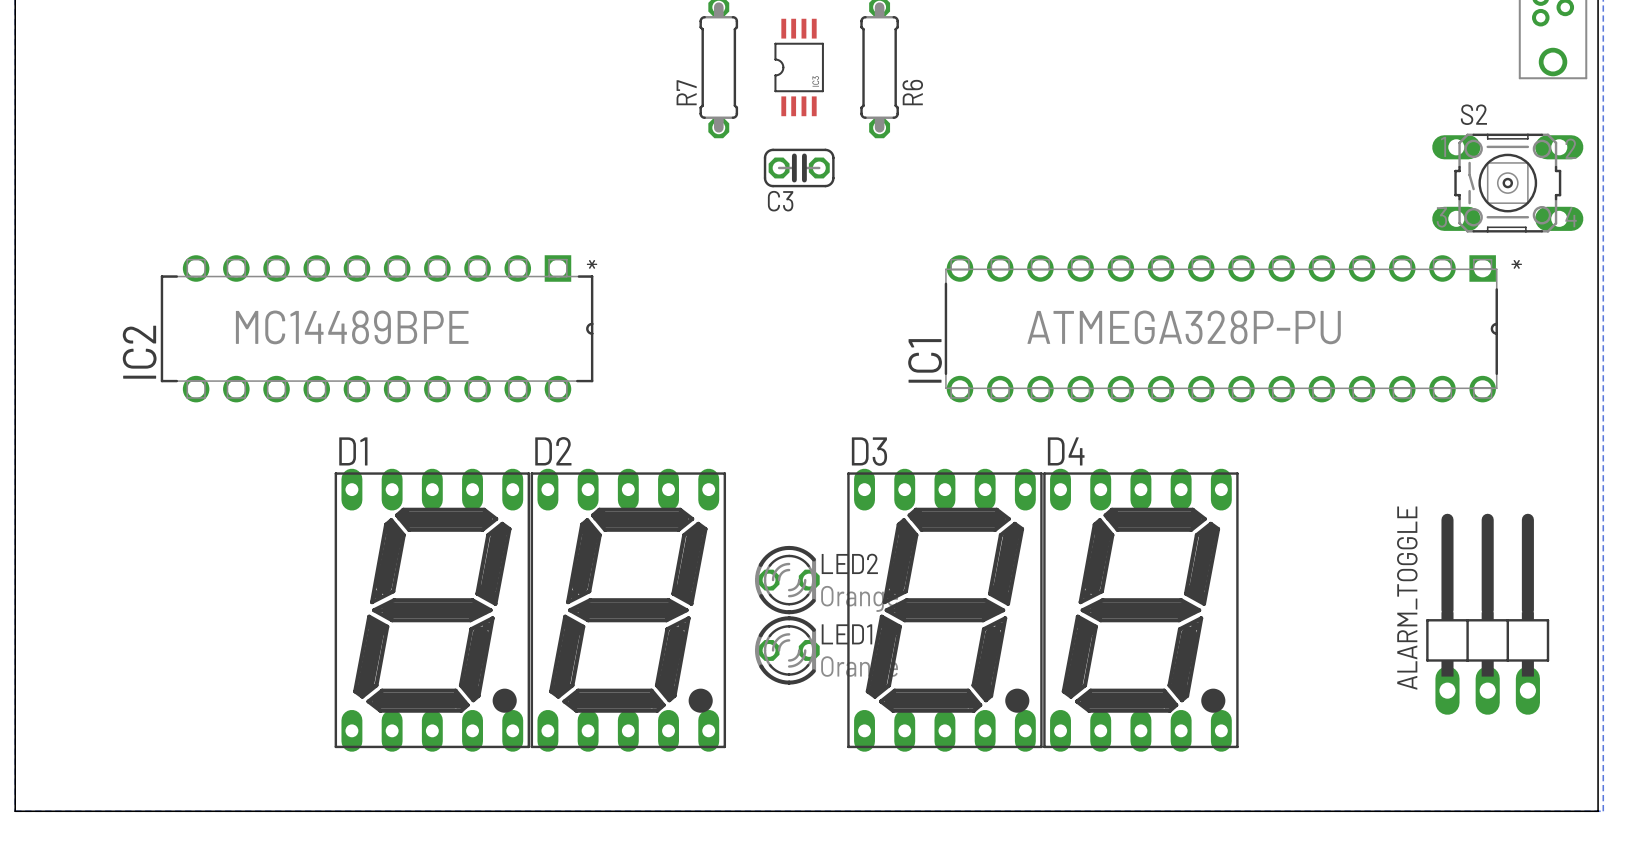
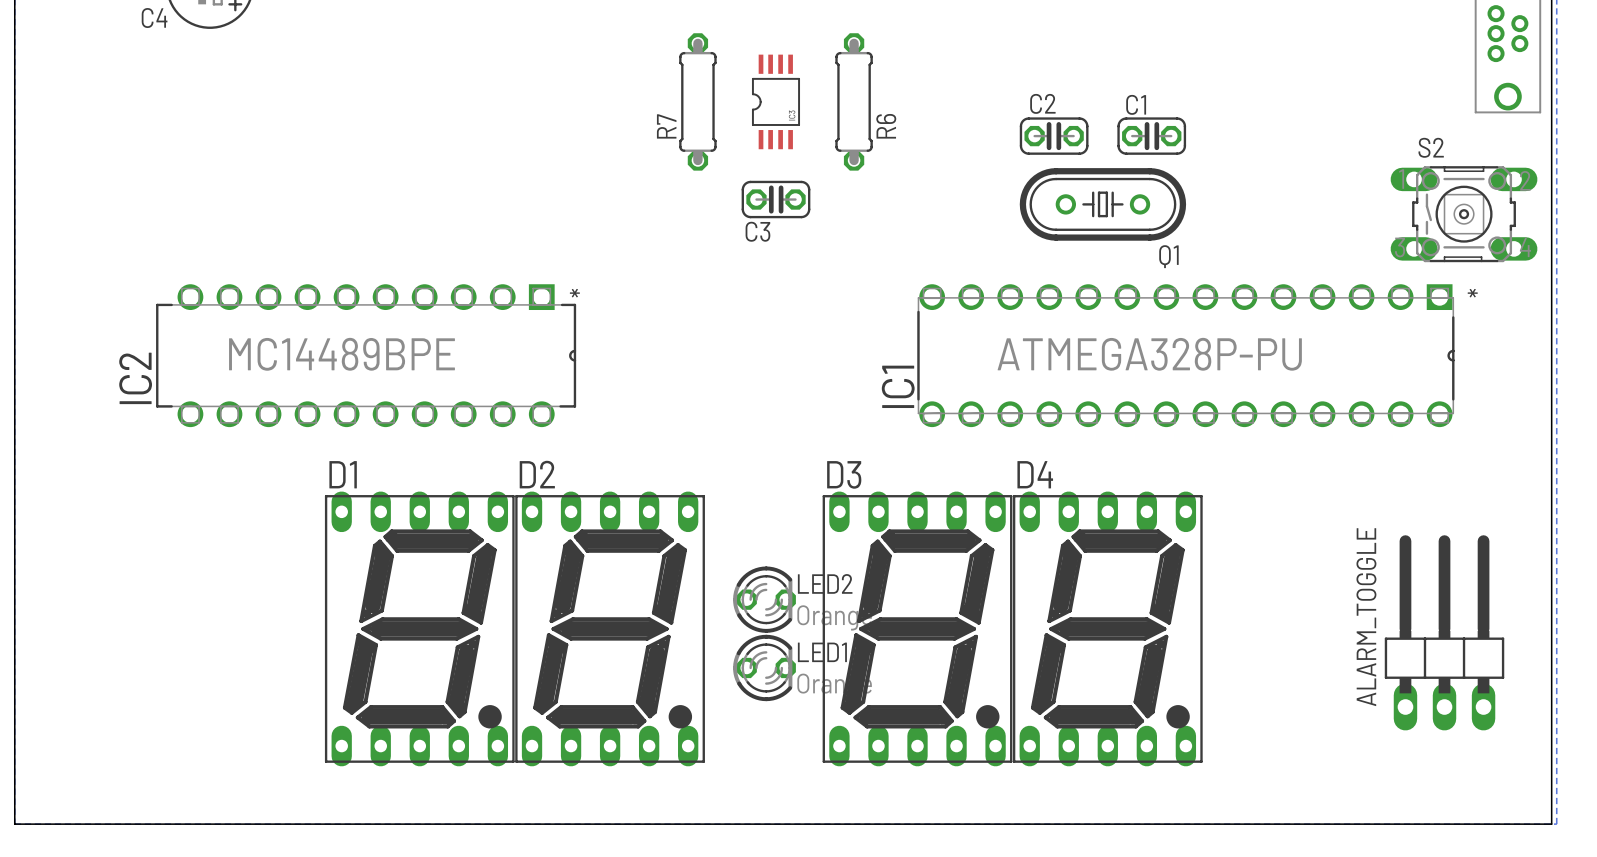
C2: none -> (1054, 136)
C1: none -> (1151, 136)
Q1: none -> (1102, 204)

